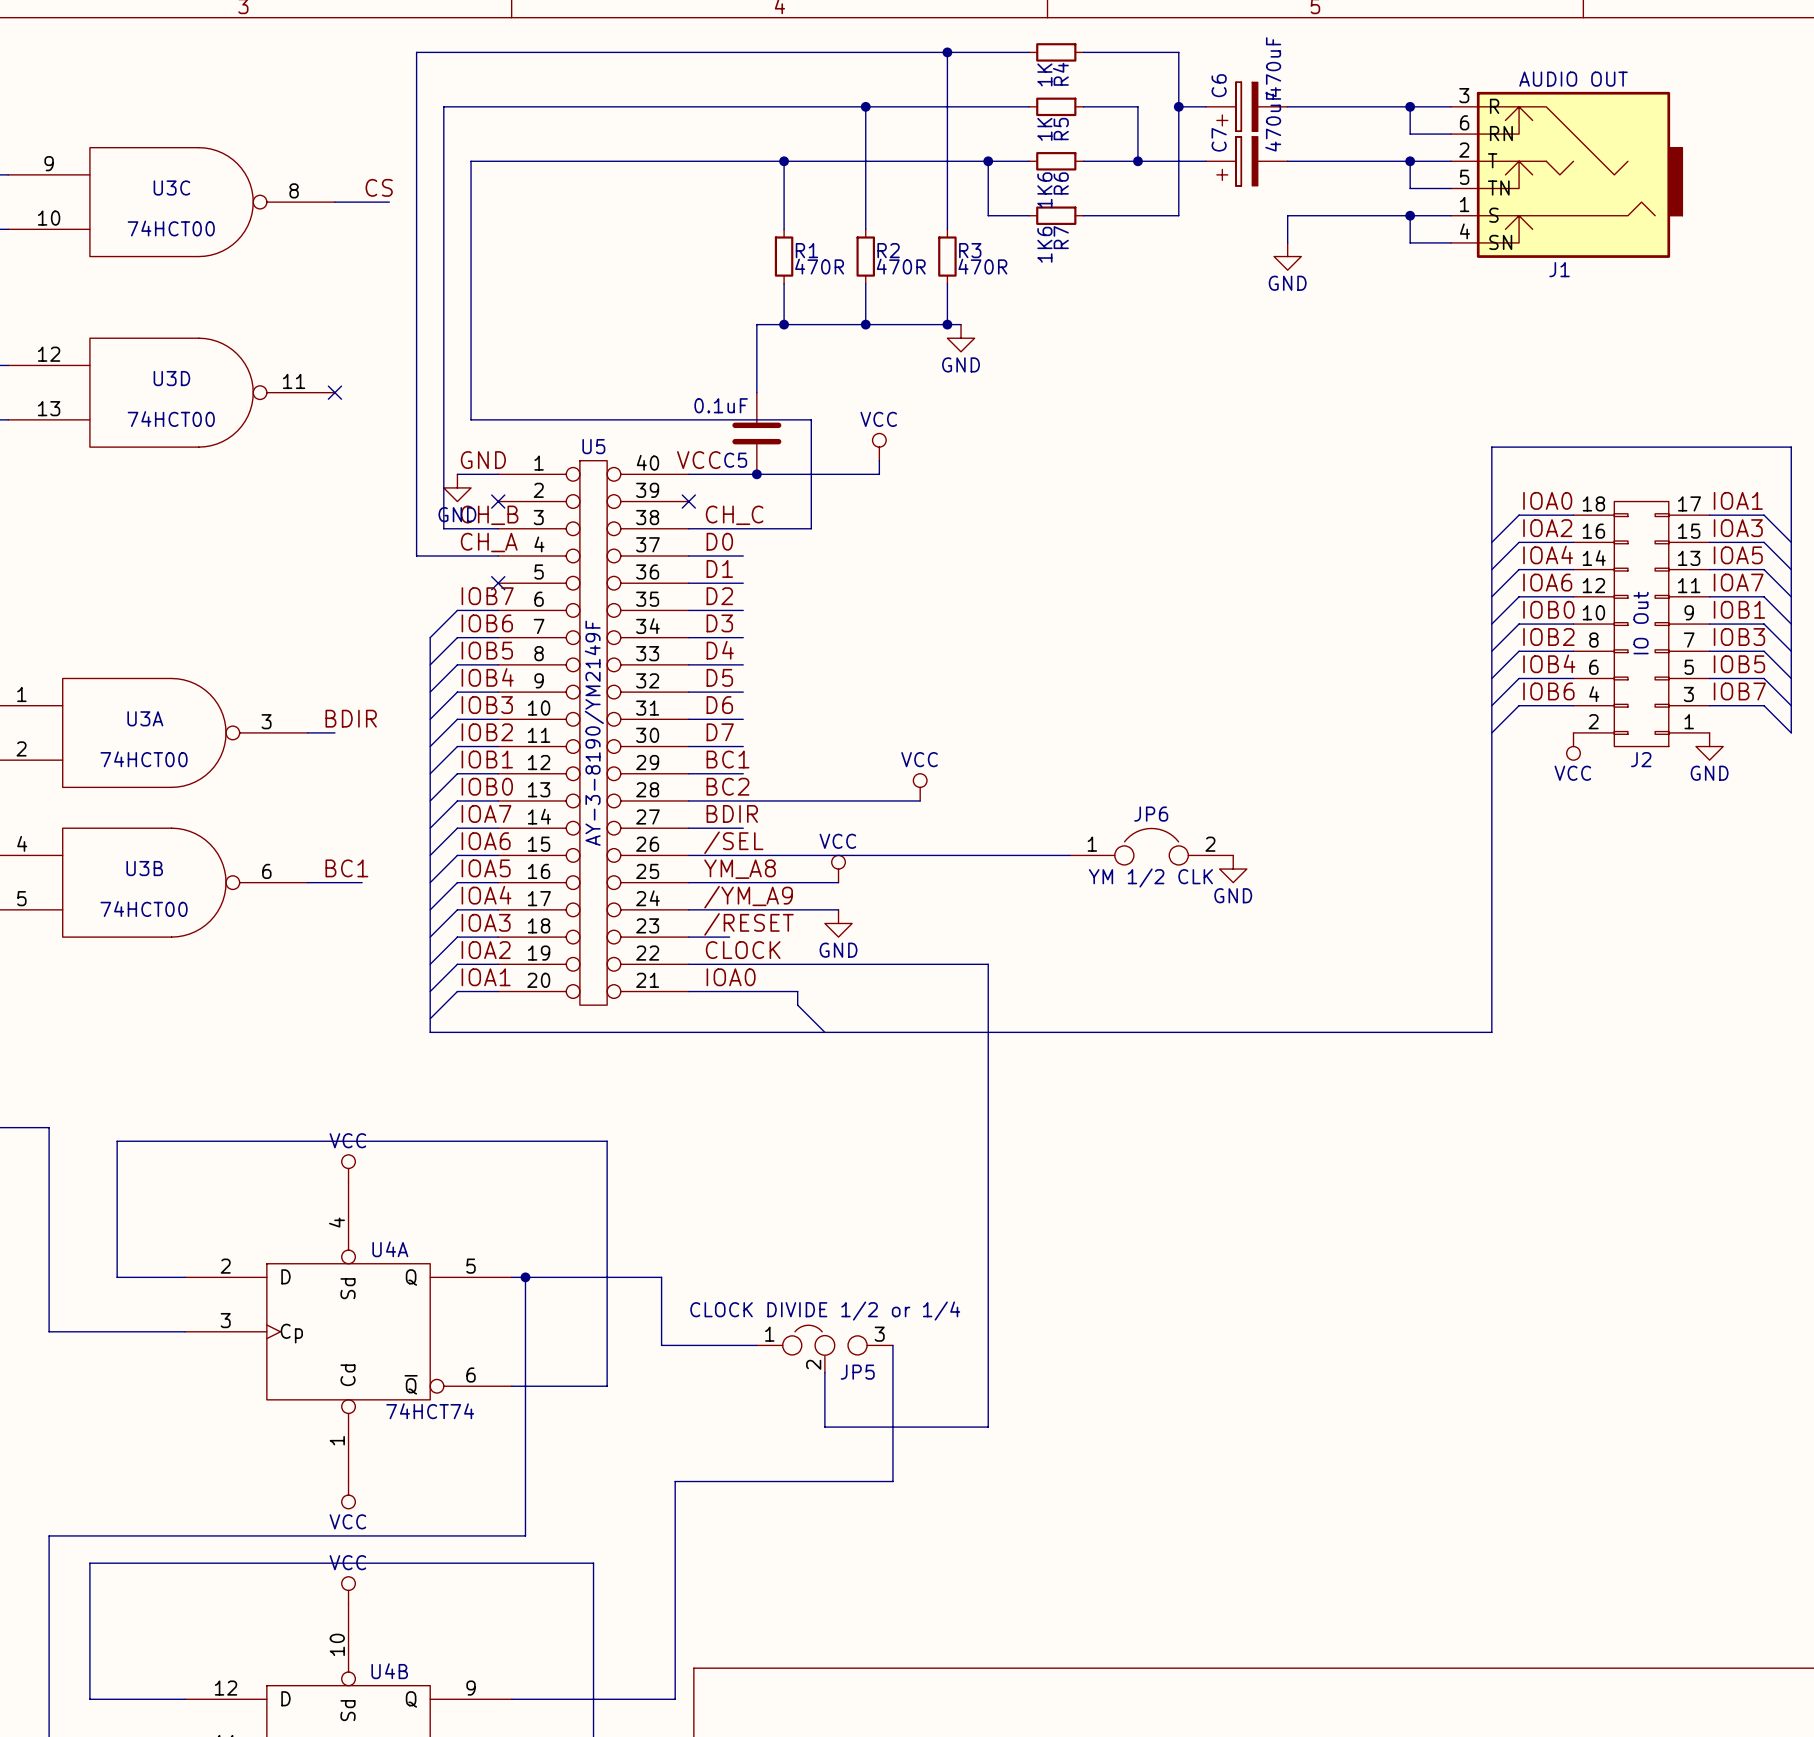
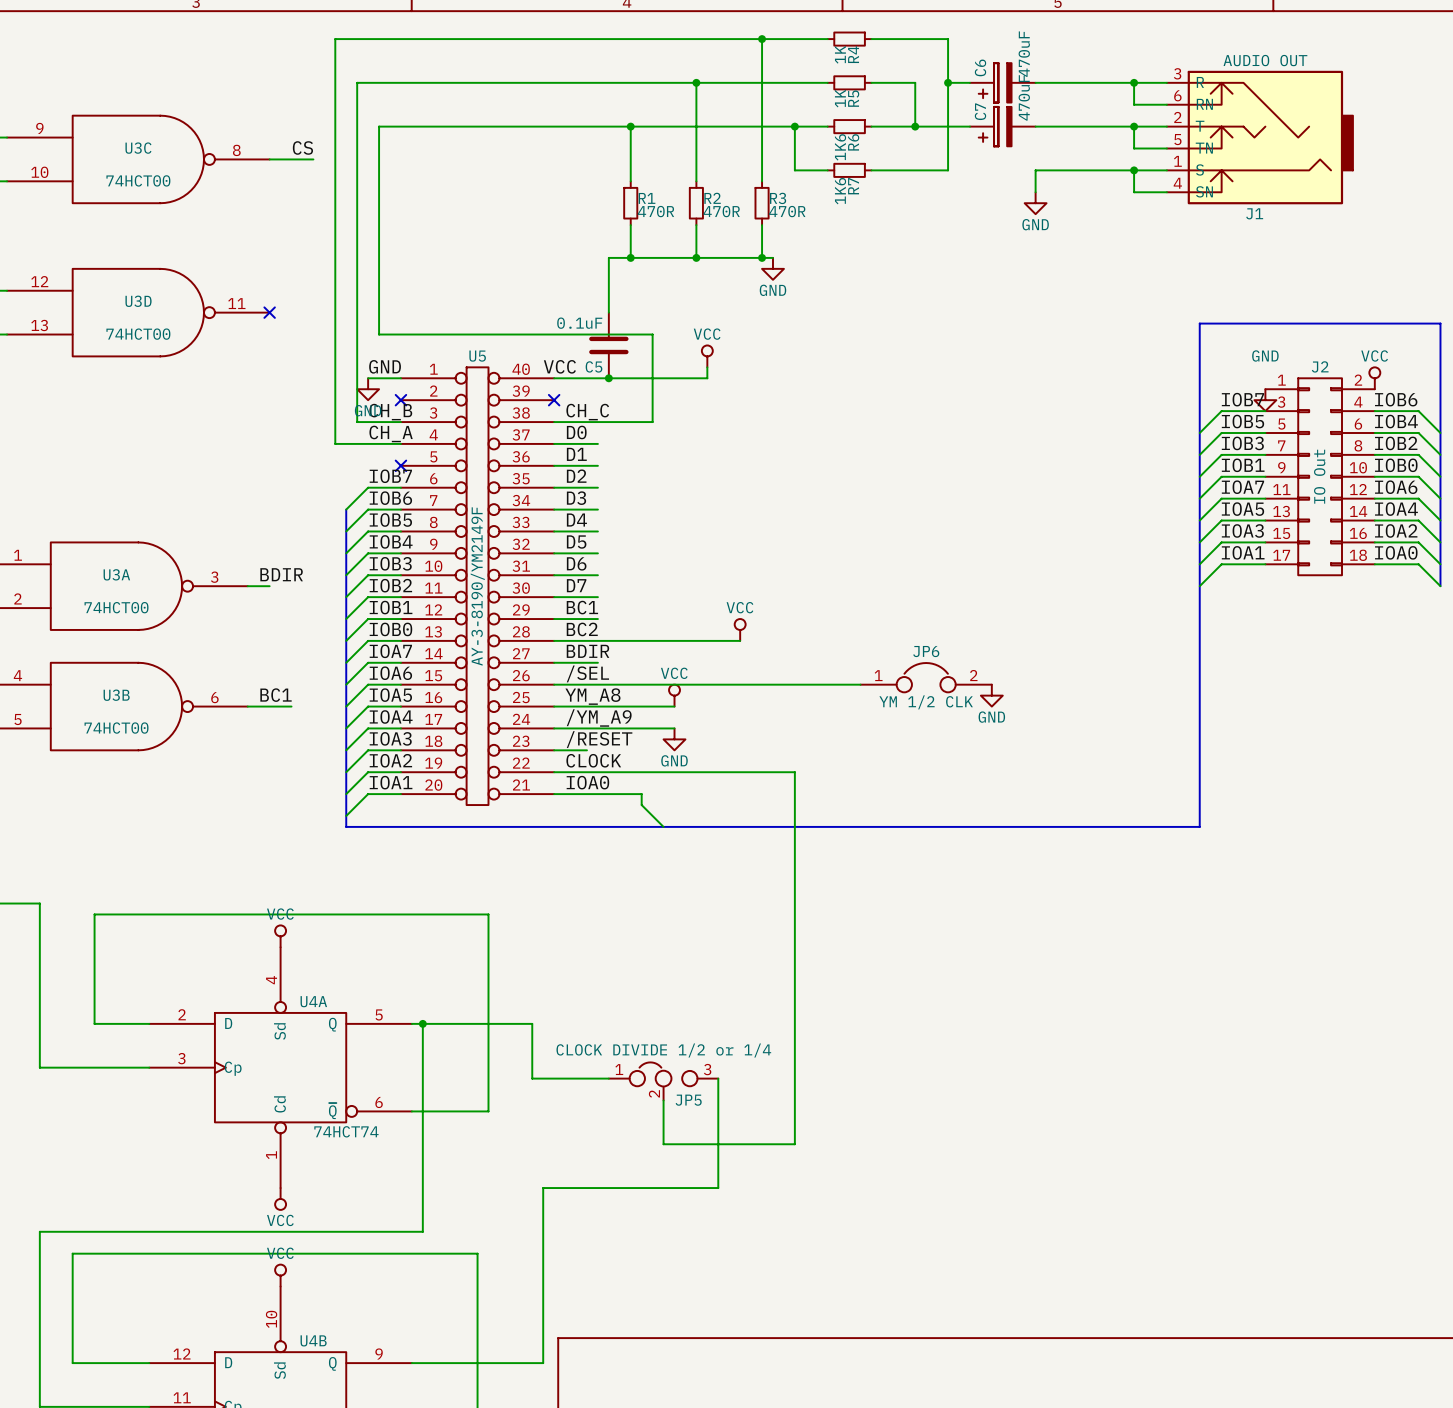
bus: (1491, 447) (1791, 447) -> (1199, 356) (1199, 323) (1440, 323) (1440, 356)
power symbol: none -> VCC (1374, 378)
label: IOA0 (1547, 500) -> none
label: none -> IOB6 (1396, 399)
label position: IOA1 (1738, 500) -> IOA1 (1243, 552)
power symbol: none -> GND (1265, 400)
label: none -> IOB4 (1396, 421)
label: IOA2 (1547, 528) -> none
label position: IOA3 (1738, 528) -> IOA3 (1242, 530)
label position: IOA4 (1548, 554) -> IOA4 (1396, 509)
label position: IOA5 (1738, 555) -> IOA5 (1242, 509)
label position: IOA6 (1547, 582) -> IOA6 (1396, 487)
label position: IOA7 (1738, 582) -> IOA7 (1242, 487)
label position: IOB0 (1548, 609) -> IOB0 (1396, 465)
label position: IOB1 (1739, 609) -> IOB1 (1243, 465)
J2 rotation: 0° (1641, 624) -> 180° (1320, 476)
label position: IOB2 (1548, 637) -> IOB2 (1396, 443)
label position: IOB3 (1739, 637) -> IOB3 (1242, 443)
label: IOB4 (1549, 663) -> none
label: none -> IOA2 (1396, 530)
label position: IOB5 (1739, 664) -> IOB5 (1242, 421)
label: IOB6 (1548, 691) -> none
label: none -> IOA0 (1396, 552)
label position: IOB7 (1739, 691) -> IOB7 (1242, 399)
power symbol: VCC (1573, 746) -> none
power symbol: GND (1709, 746) -> none

